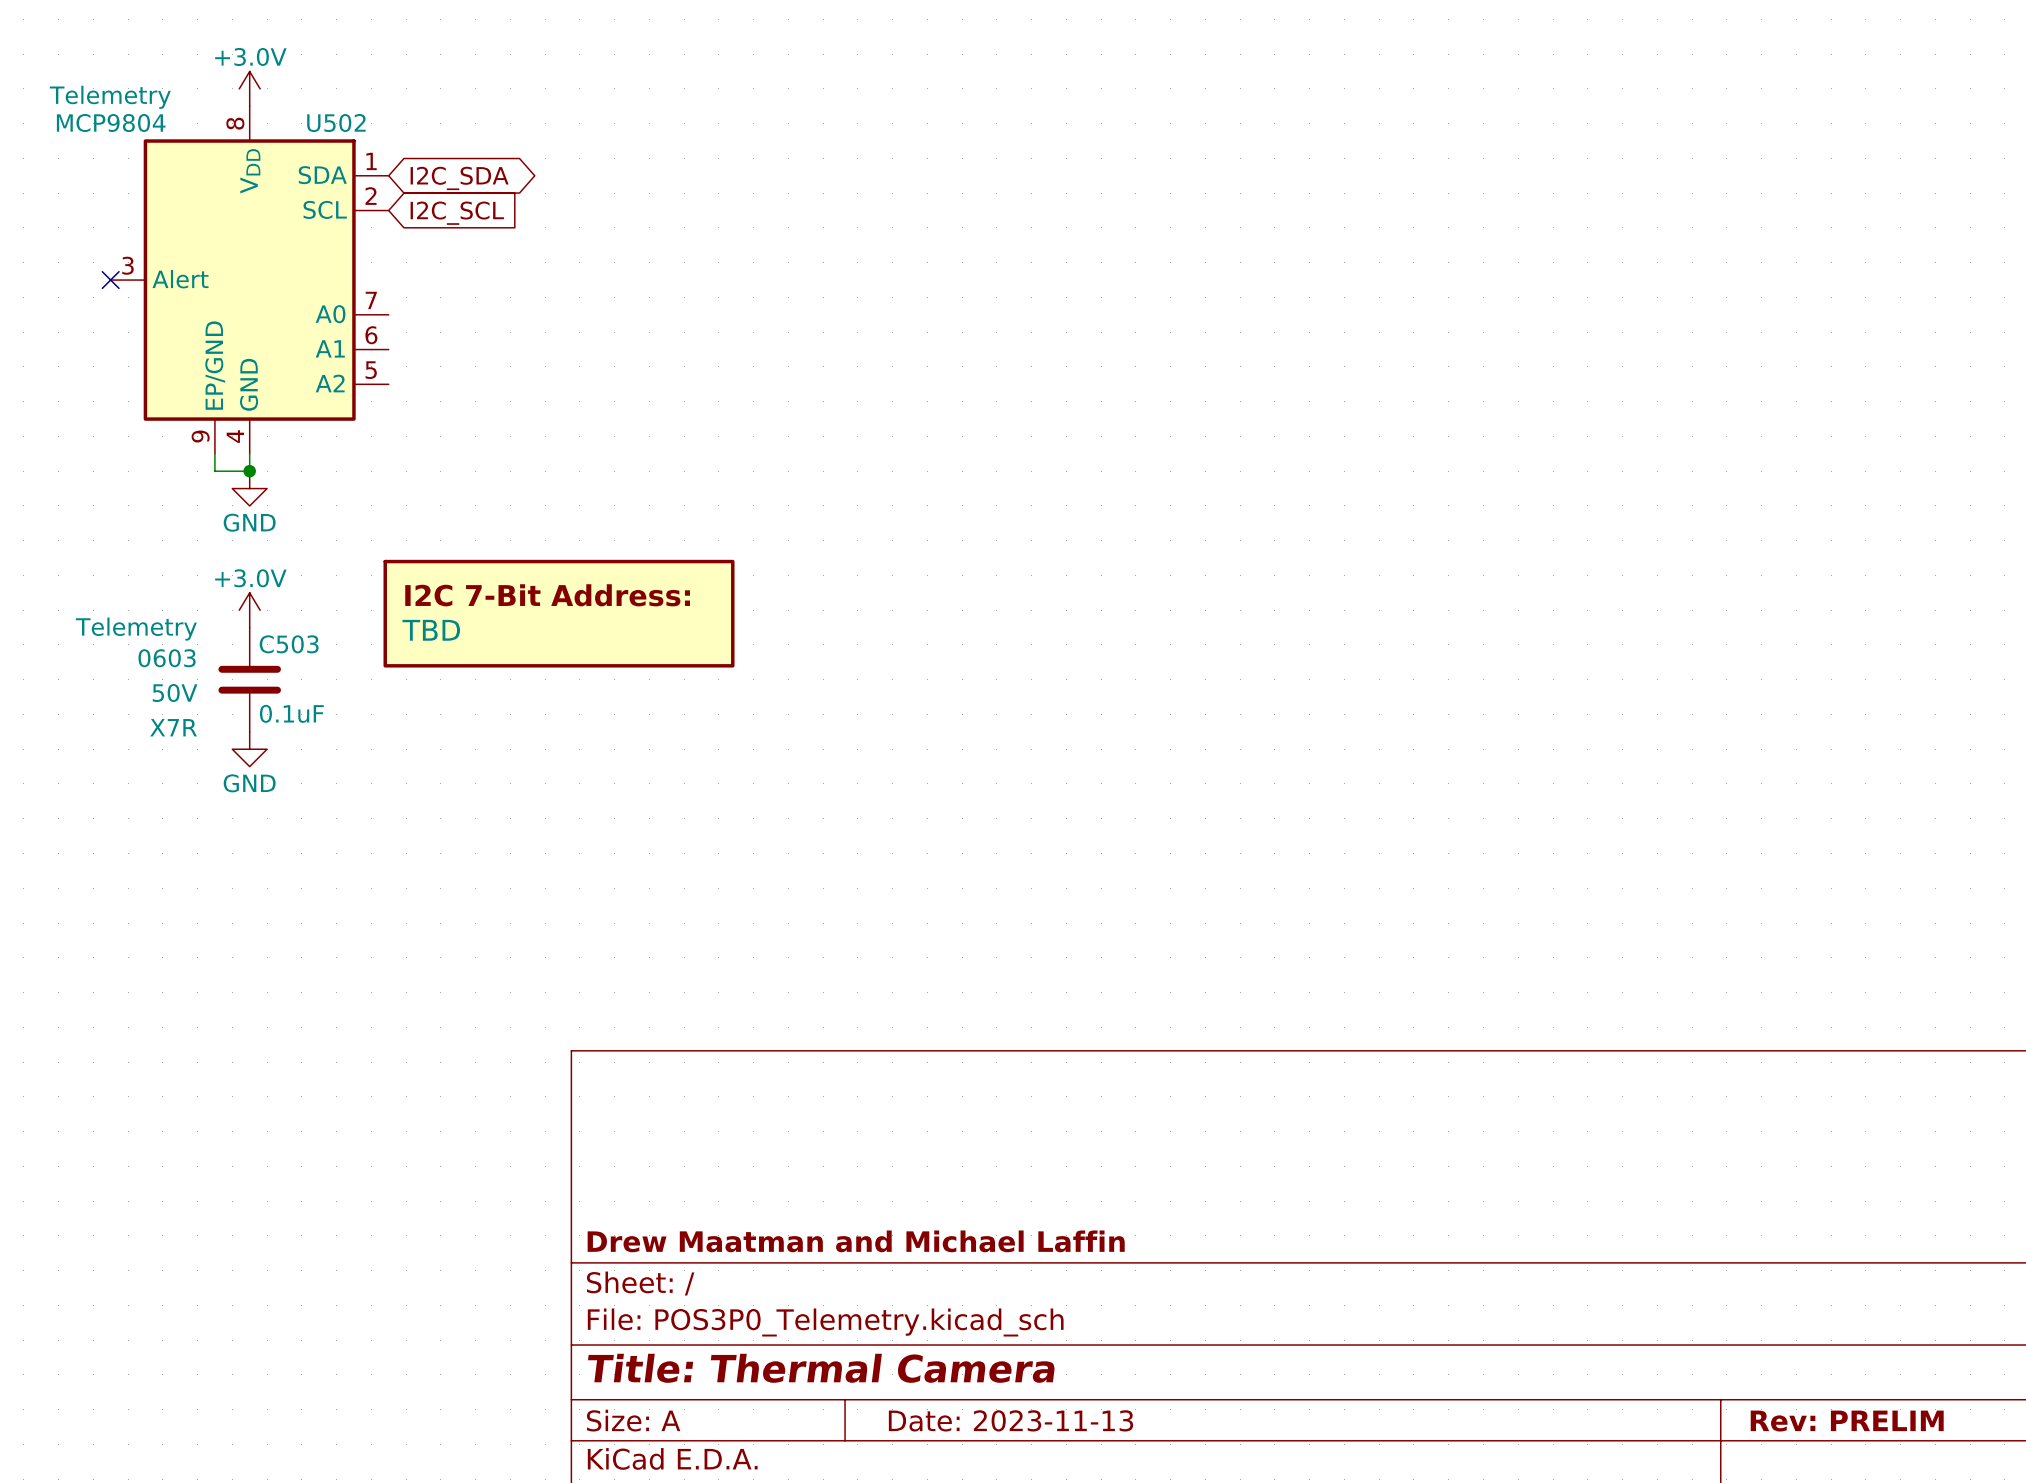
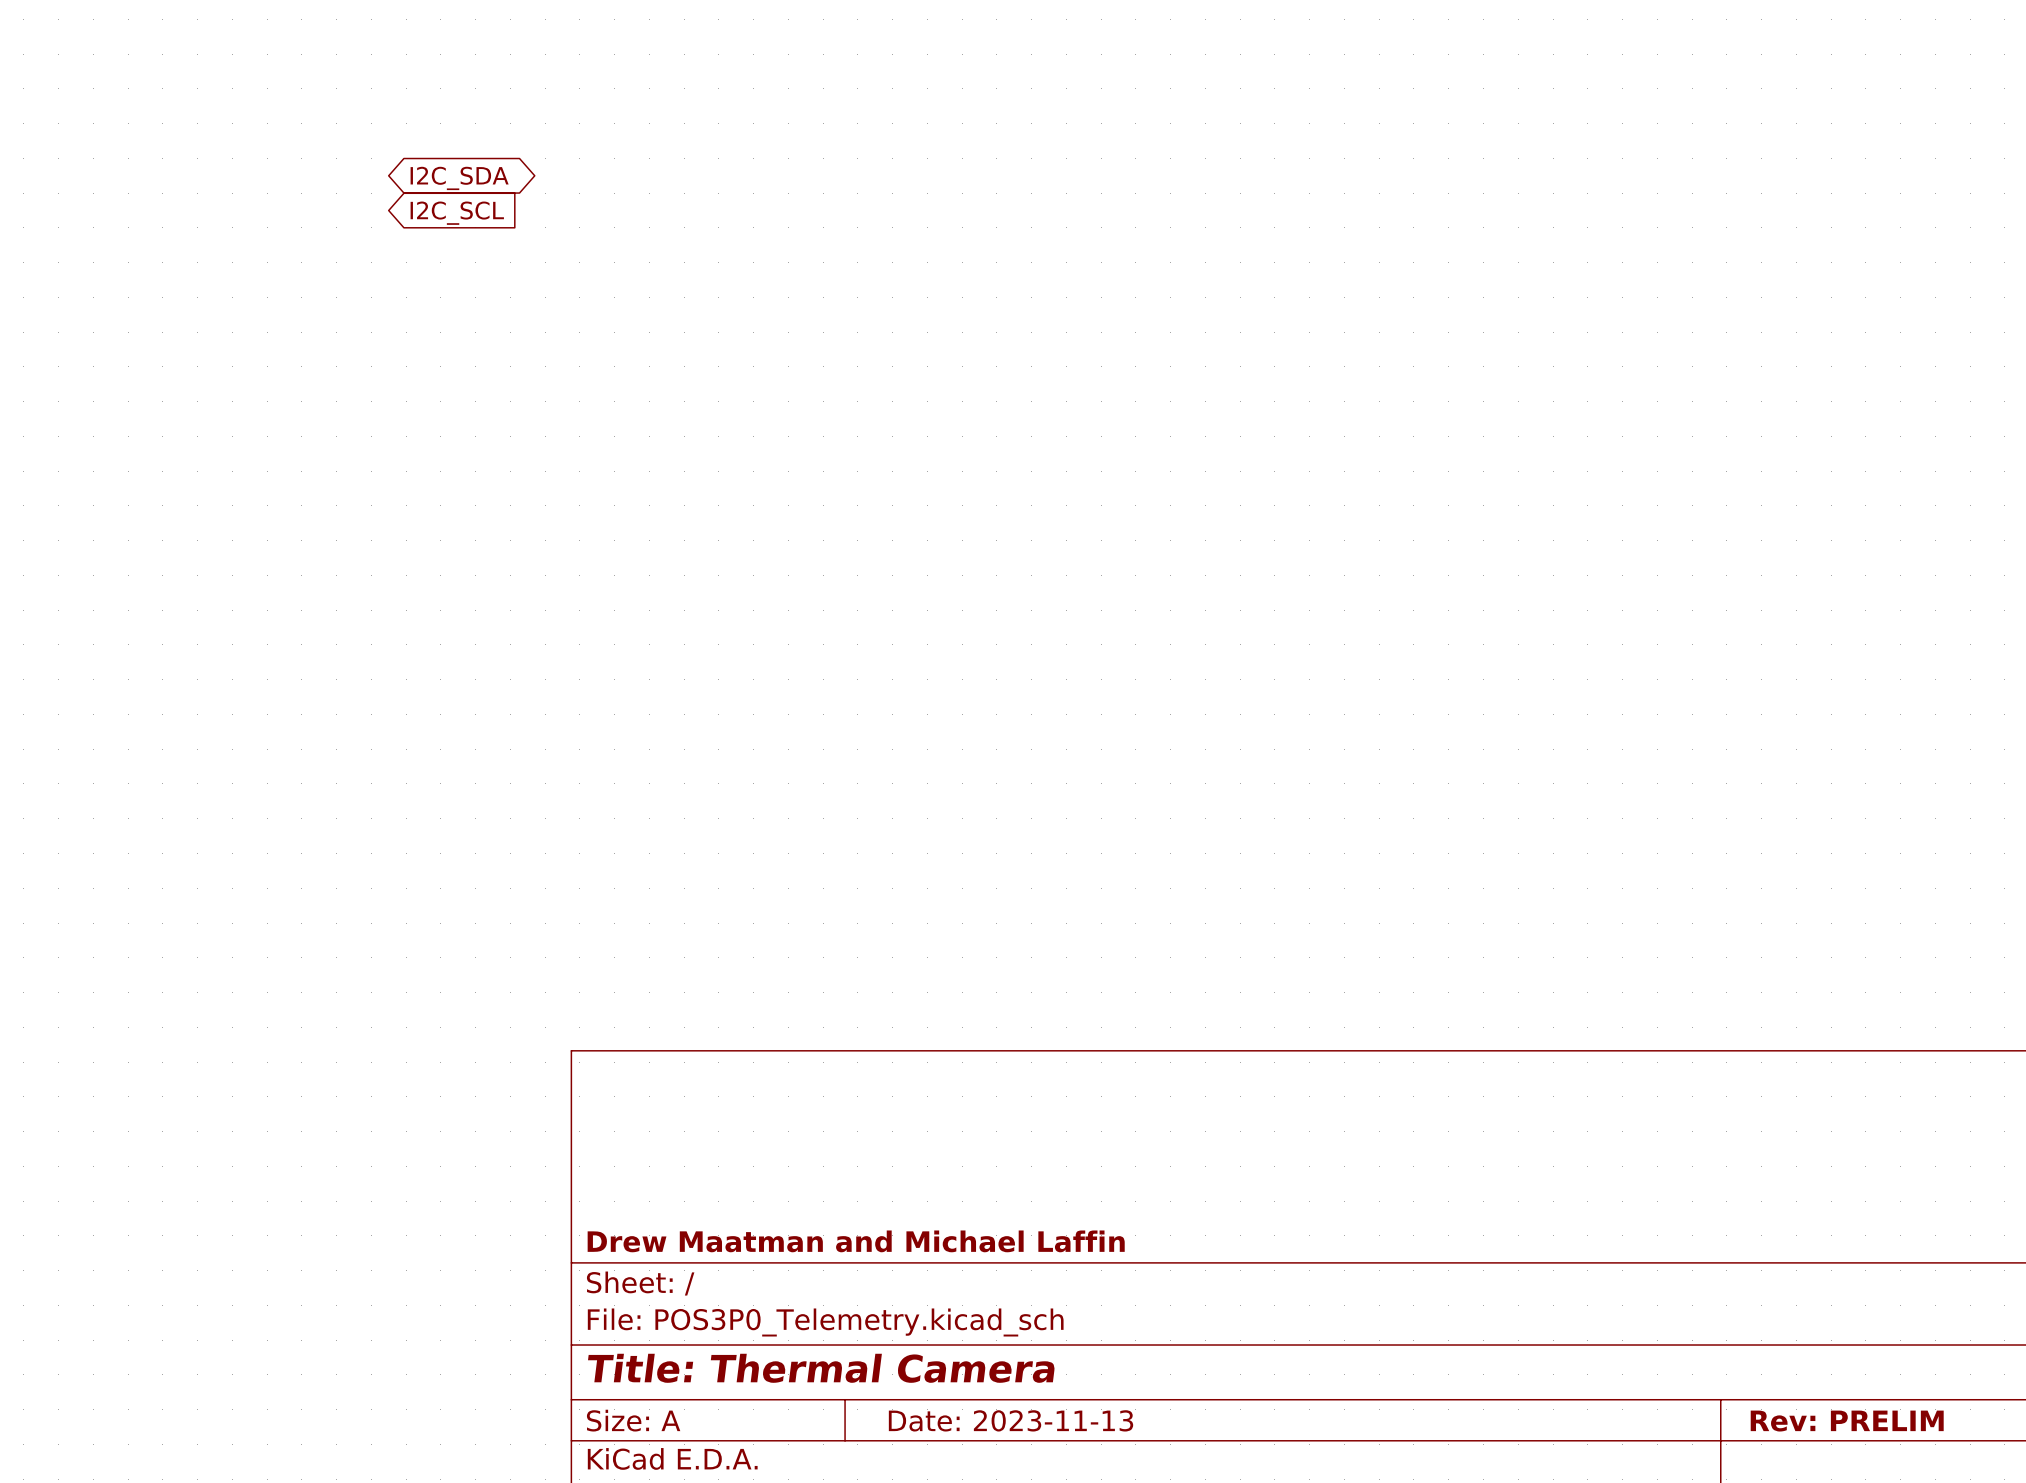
power symbol: +3.0V (249, 88) -> none
no-connect mark: (110, 280) -> none
U502: MCP9804 (249, 280) -> none
wire: (214, 453) (214, 471) (249, 471) (249, 453) -> none
junction: (249, 471) -> none
power symbol: GND (249, 488) -> none
power symbol: +3.0V (249, 610) -> none
part: TBD (559, 613) -> none
C503: 0.1uF (249, 679) -> none
power symbol: GND (249, 749) -> none

